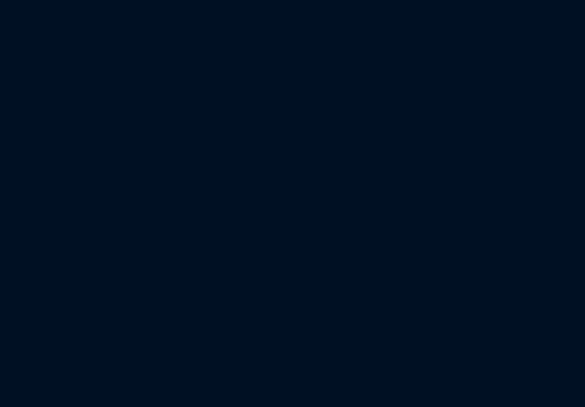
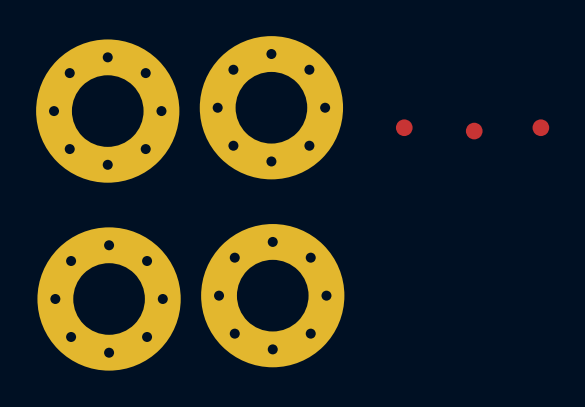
part: none -> (271, 107)
part: none -> (107, 111)
part: none -> (404, 127)
part: none -> (540, 127)
part: none -> (474, 131)
part: none -> (272, 295)
part: none -> (109, 298)

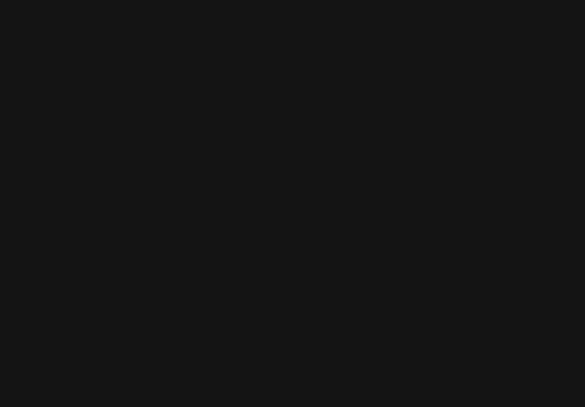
part: (271, 107) -> none
part: (107, 111) -> none
part: (404, 127) -> none
part: (540, 127) -> none
part: (474, 131) -> none
part: (272, 295) -> none
part: (109, 298) -> none

